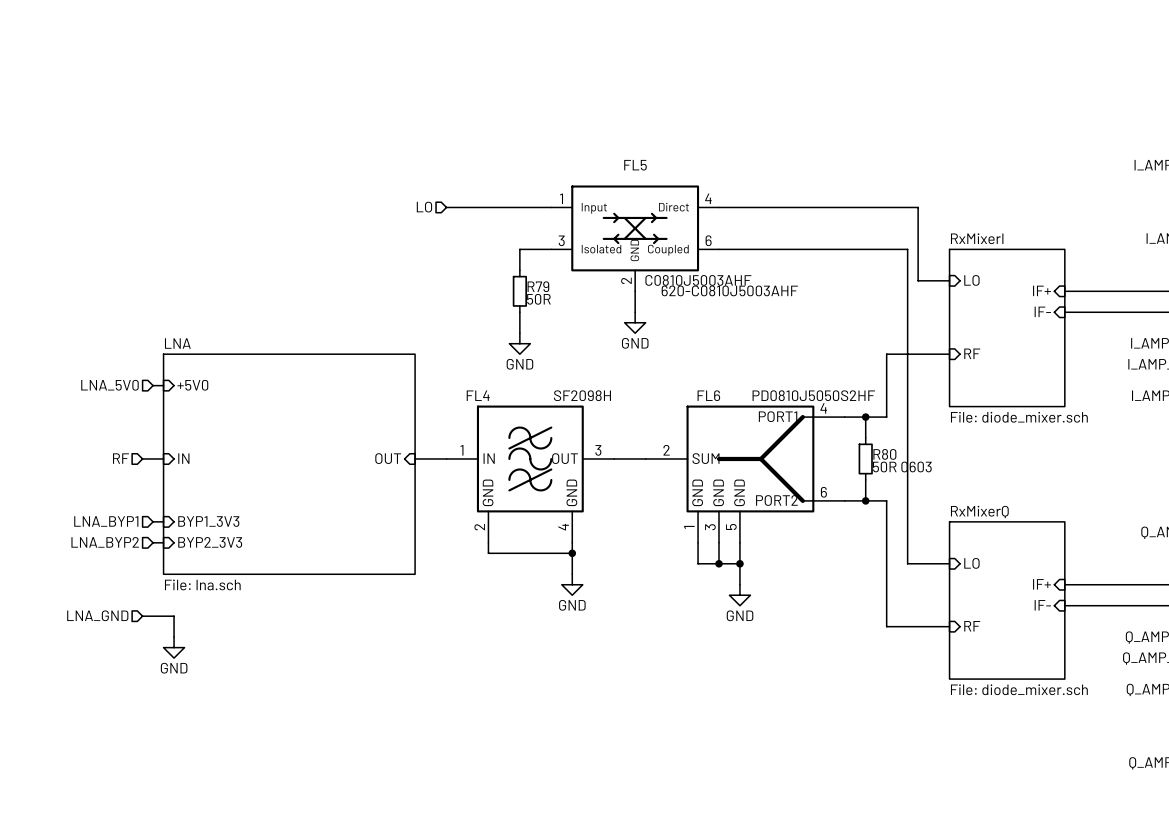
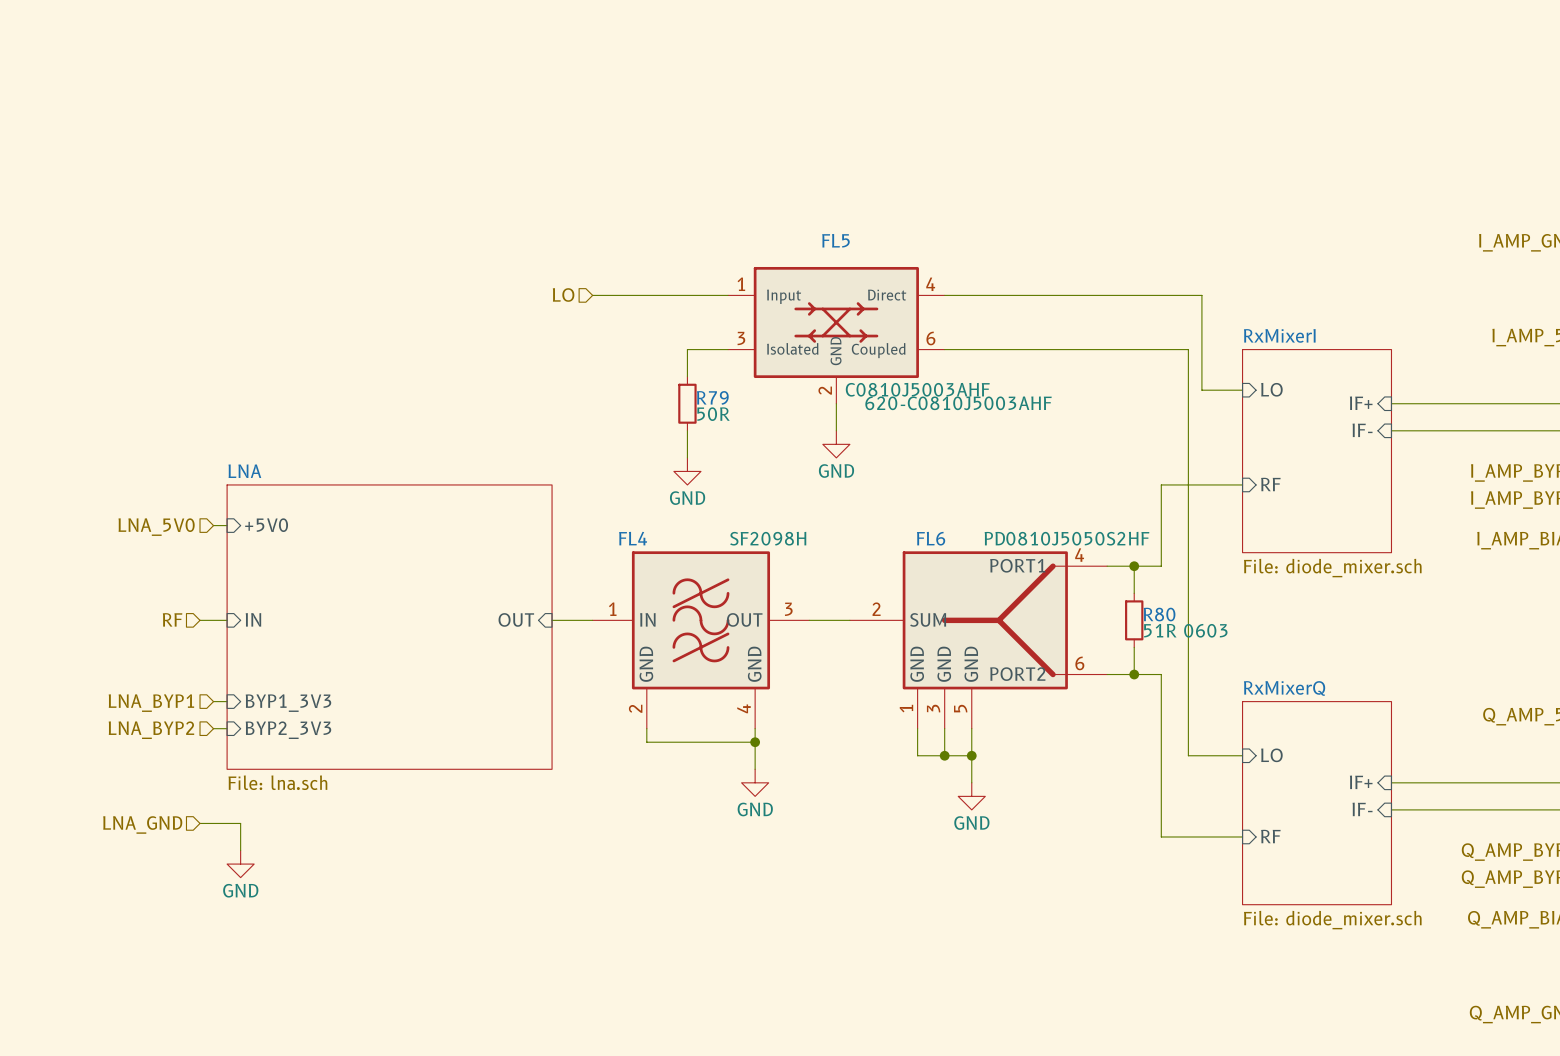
R80 value: 50R 0603 (902, 466) -> 51R 0603 (1185, 630)

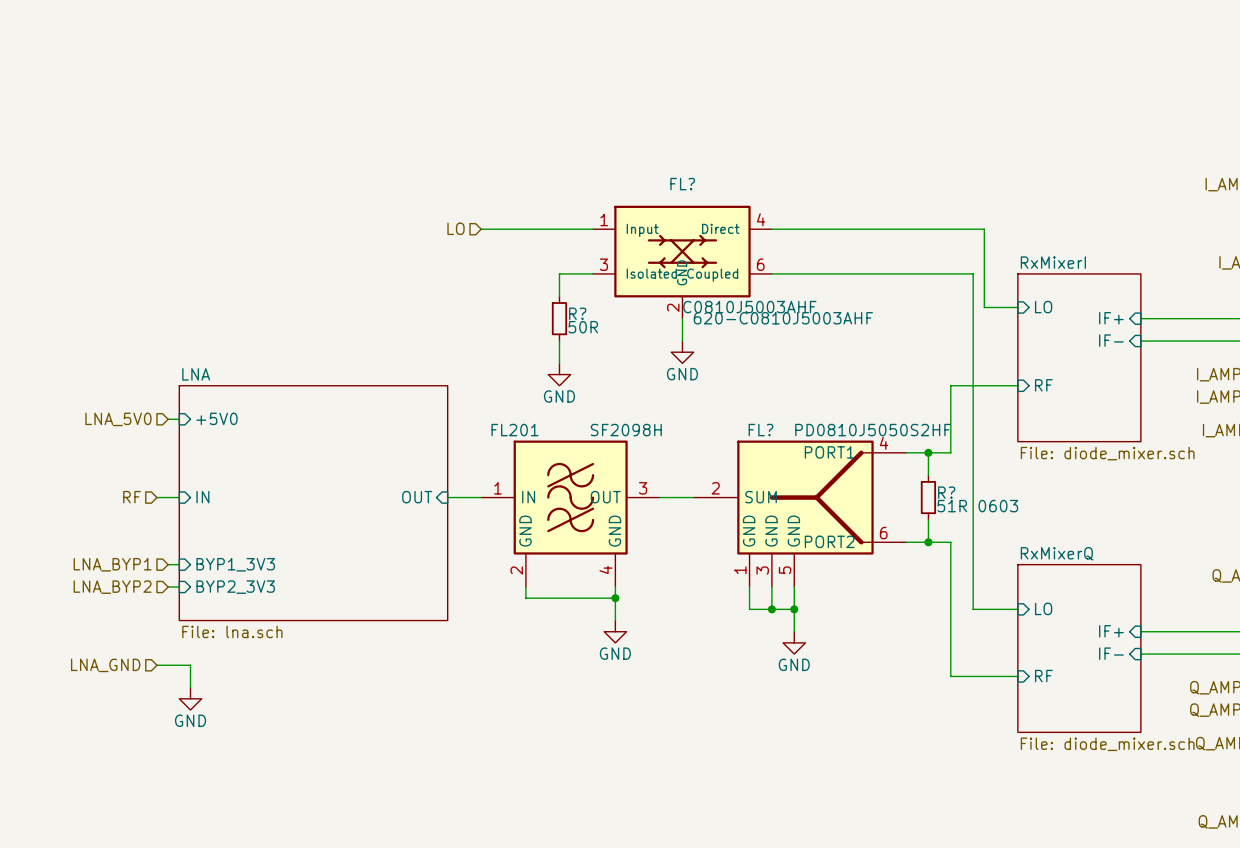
FL5 name: FL5 (835, 240) -> FL? (682, 184)
R79 name: R79 (712, 397) -> R? (577, 313)
FL4 name: FL4 (633, 538) -> FL201 (515, 430)
FL6 name: FL6 (931, 538) -> FL? (760, 430)
R80 name: R80 (1159, 614) -> R? (946, 492)

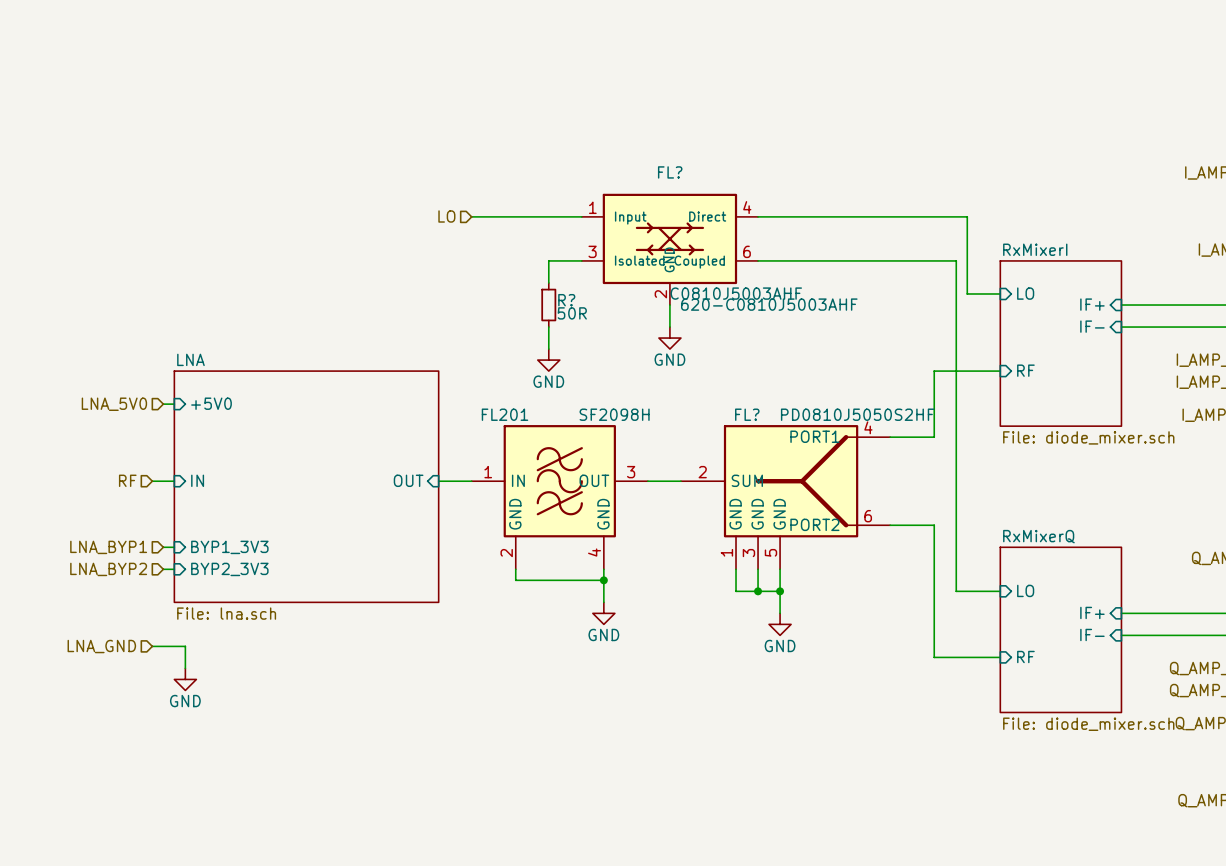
wire: (928, 452) (928, 475) -> none
junction: (928, 452) -> none
R?: 51R 0603 (928, 497) -> none
wire: (928, 519) (928, 542) -> none
junction: (928, 542) -> none

